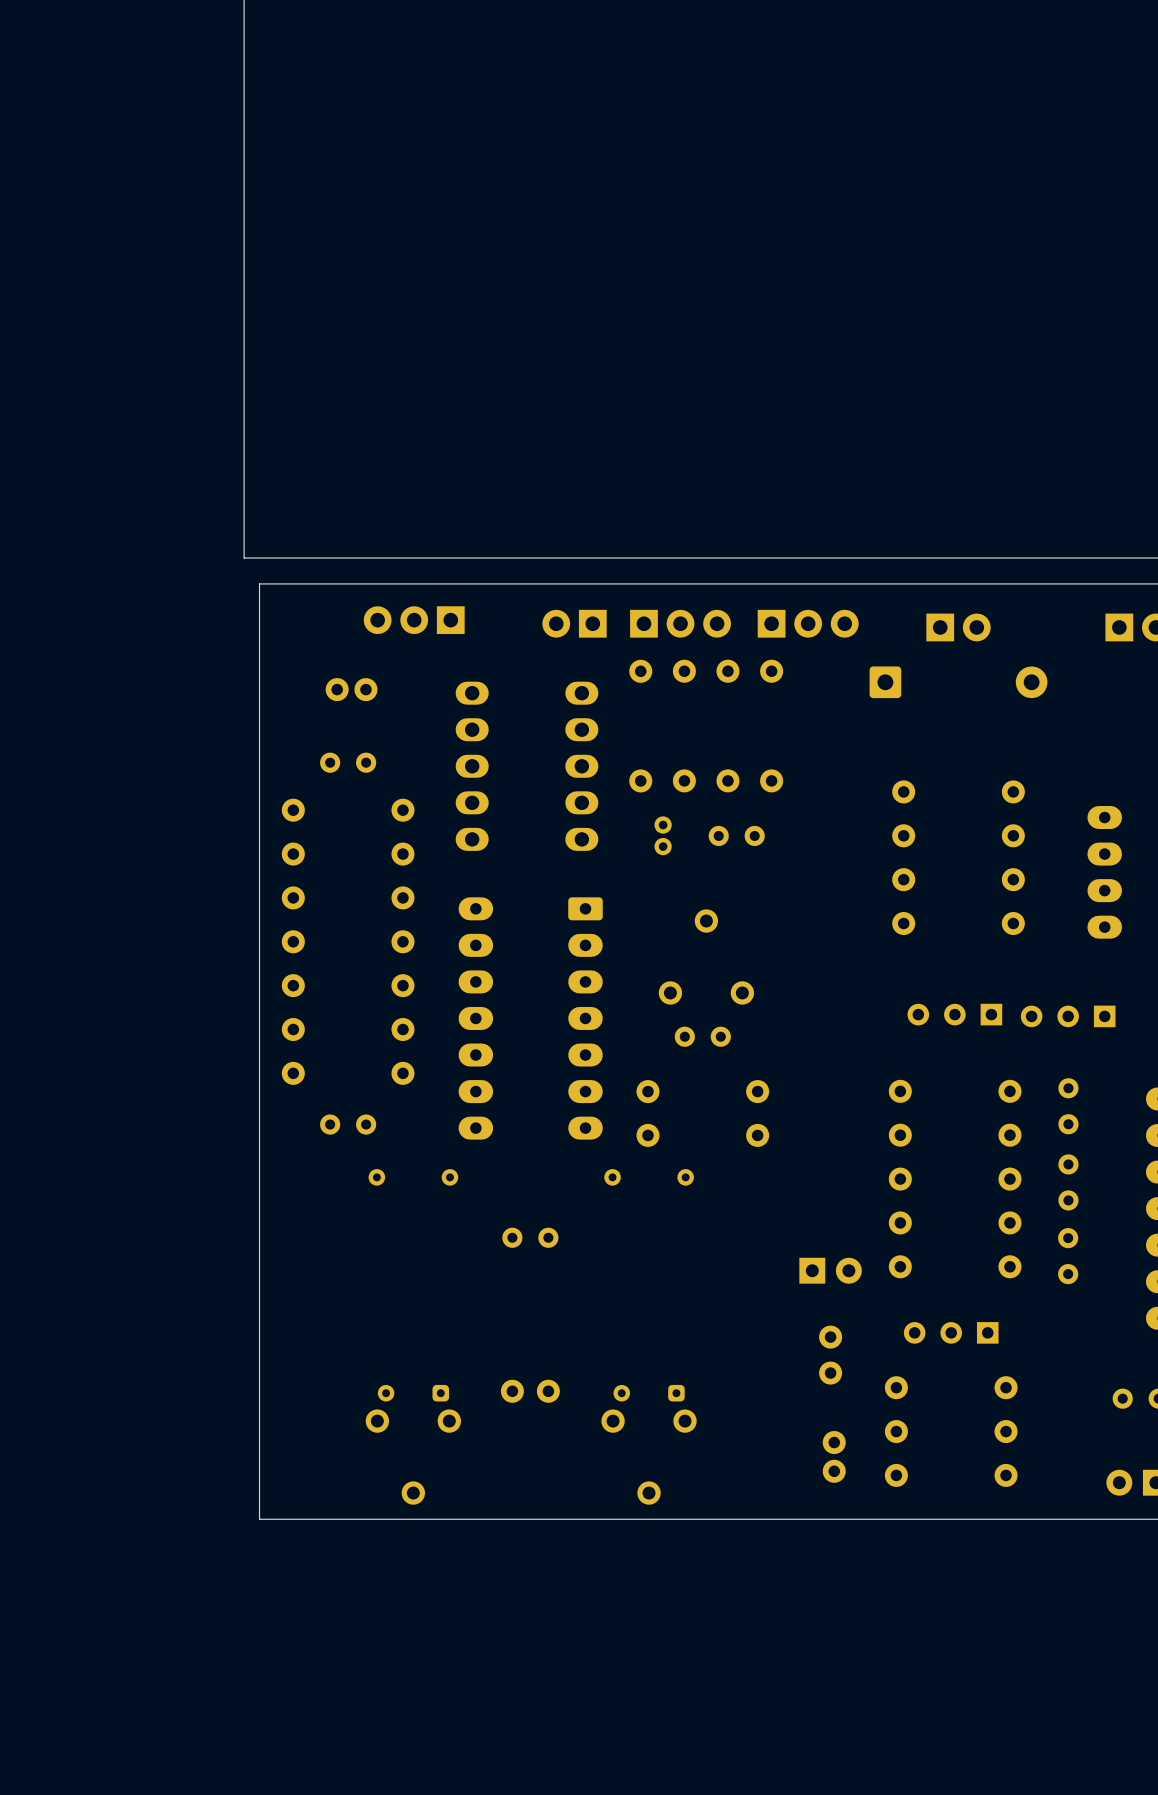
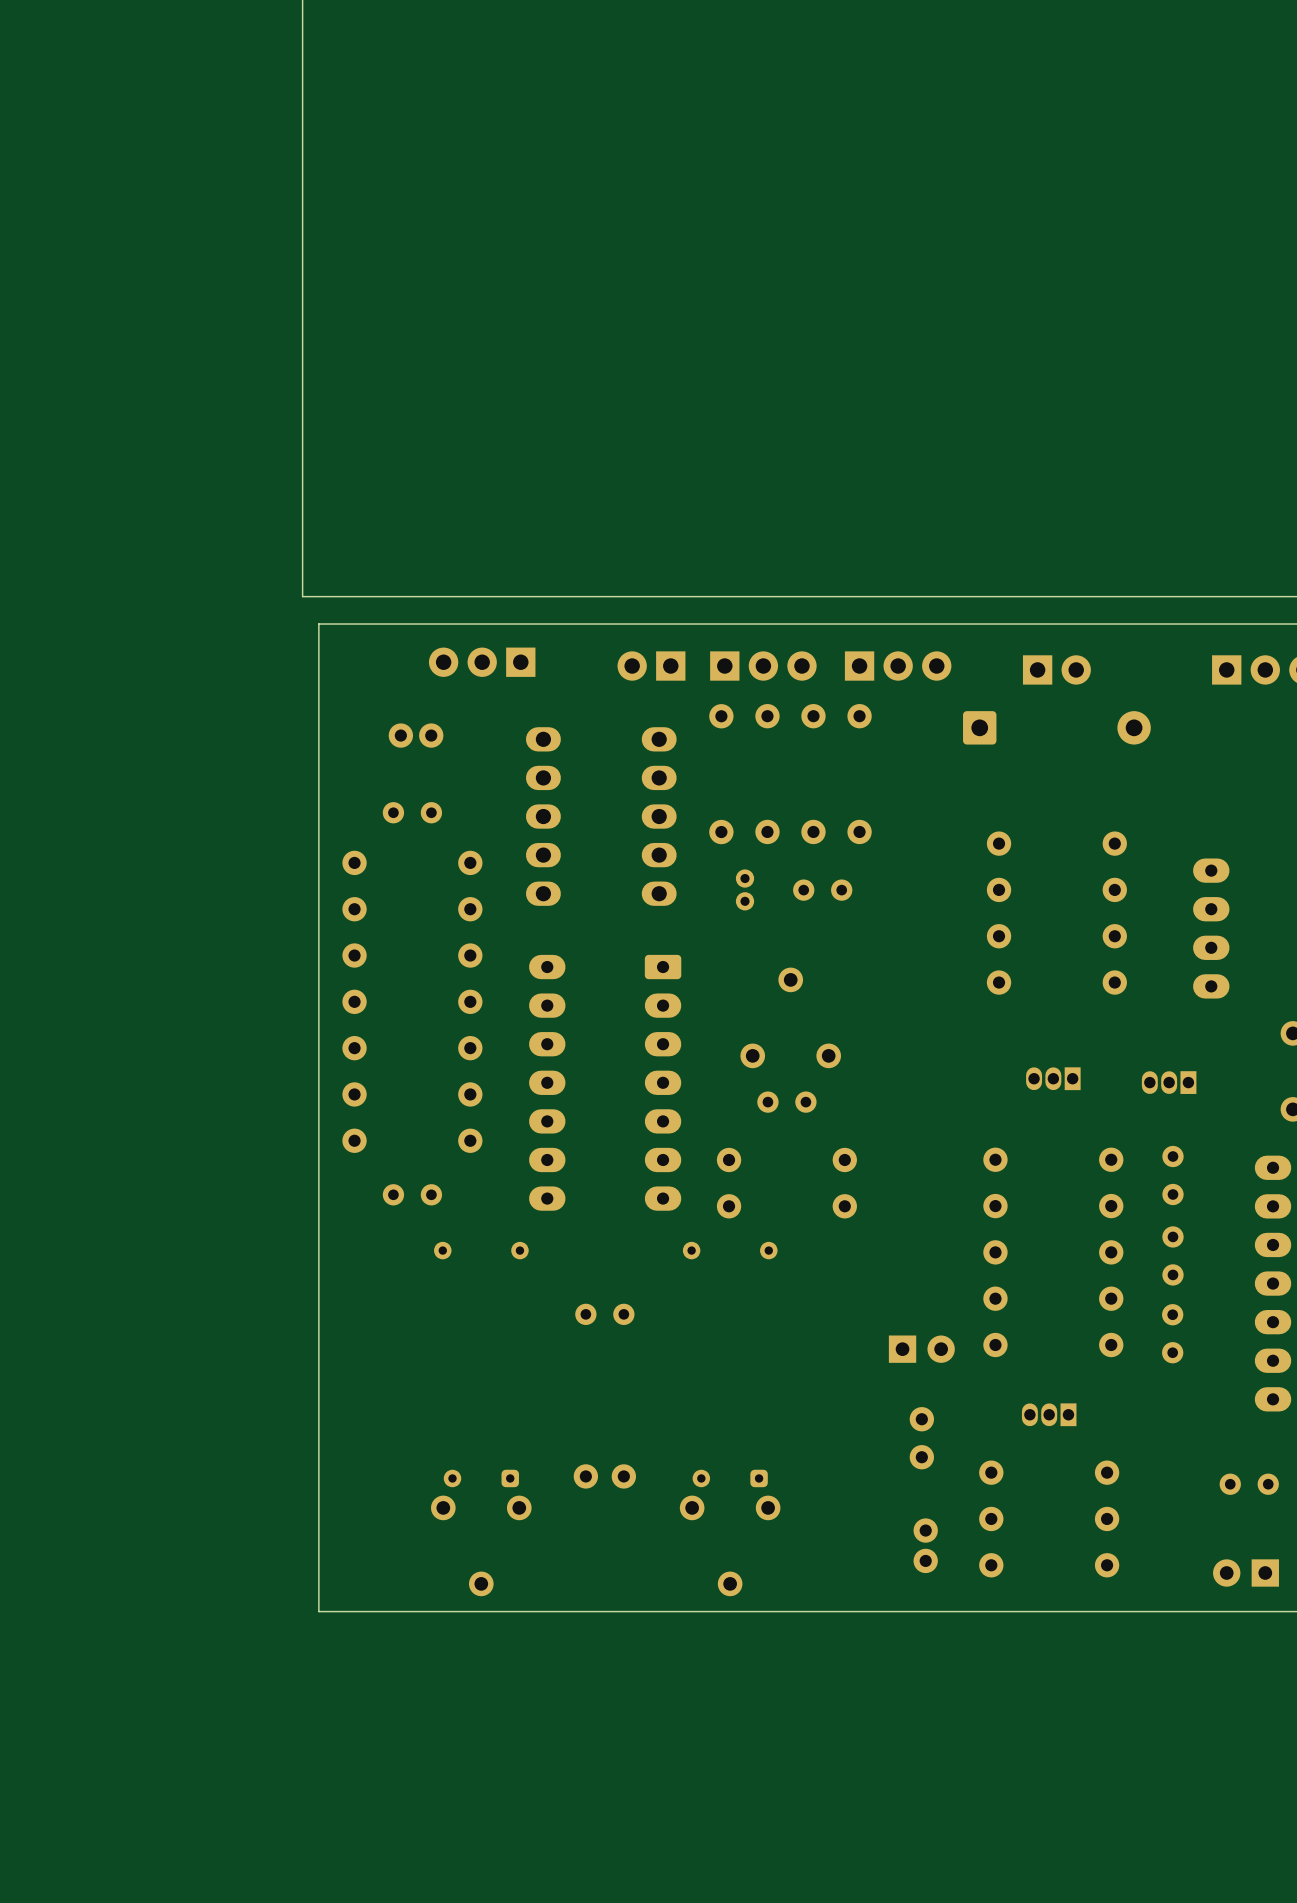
part footprint: [907, 1003, 1003, 1026] -> [1026, 1067, 1081, 1091]
part footprint: [1020, 1005, 1116, 1028] -> [1141, 1071, 1197, 1094]
part footprint: [903, 1322, 999, 1344] -> [1021, 1403, 1077, 1427]

